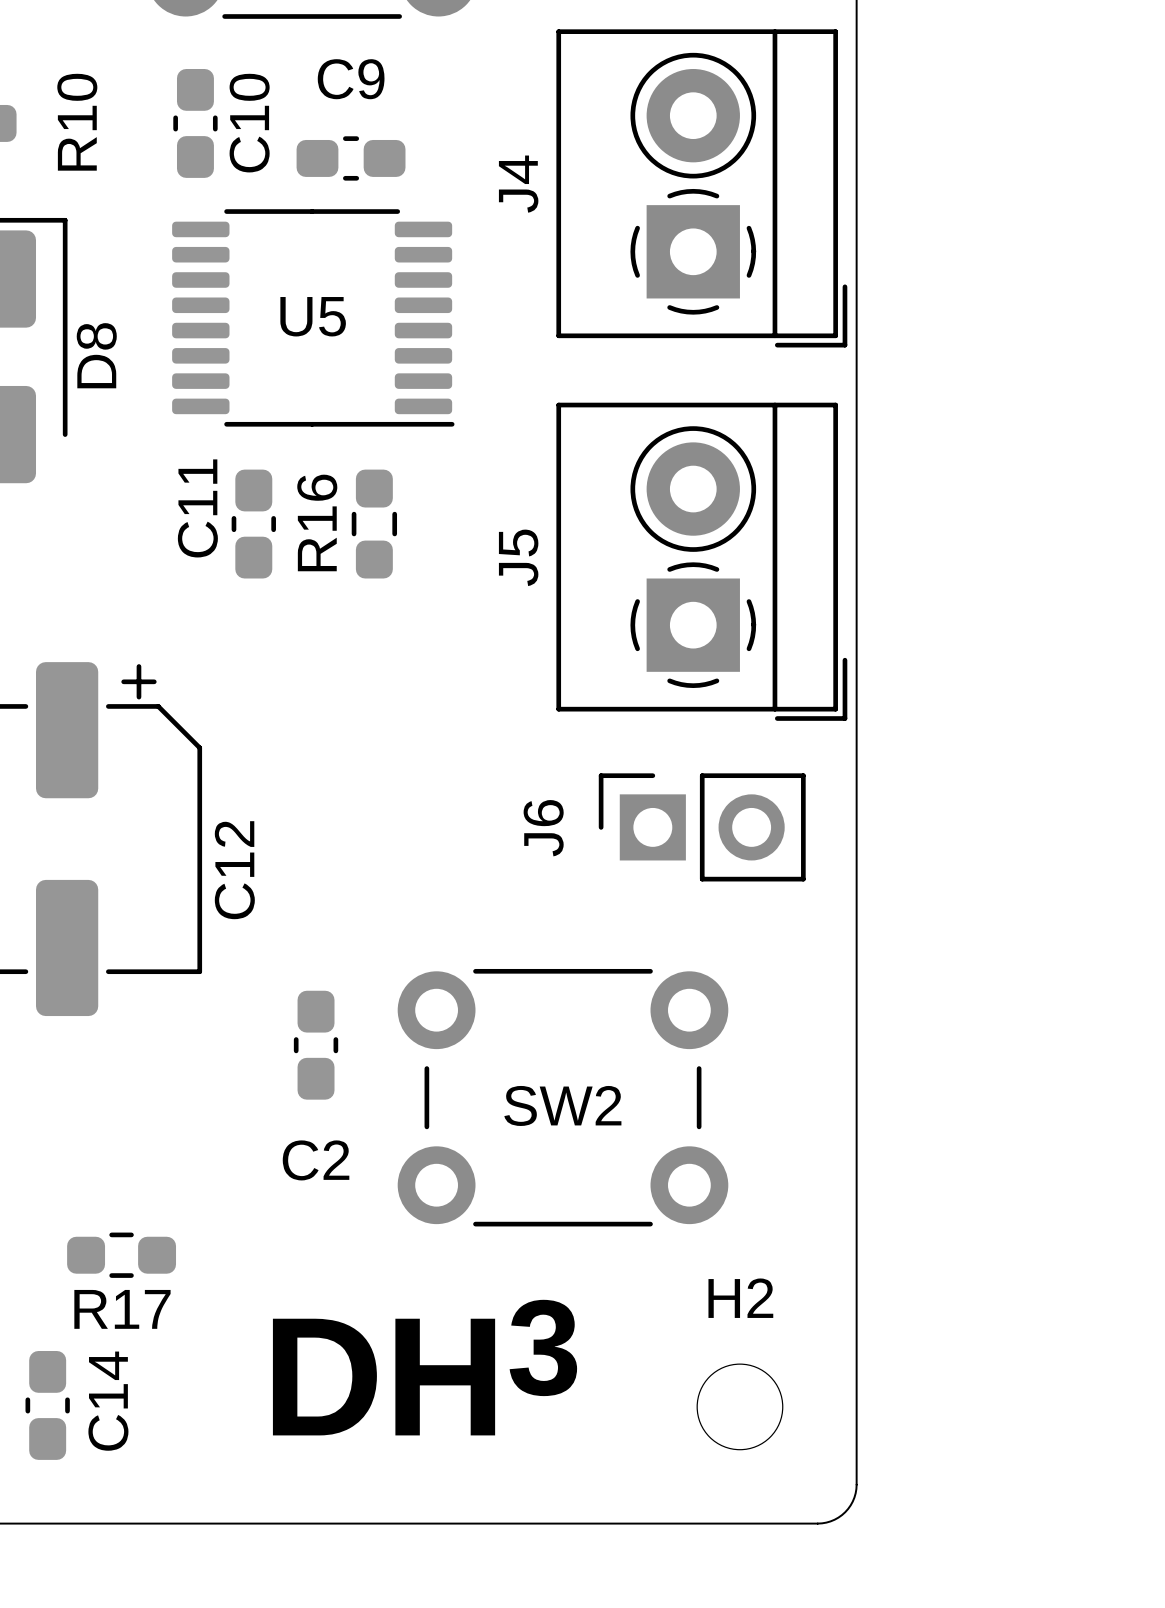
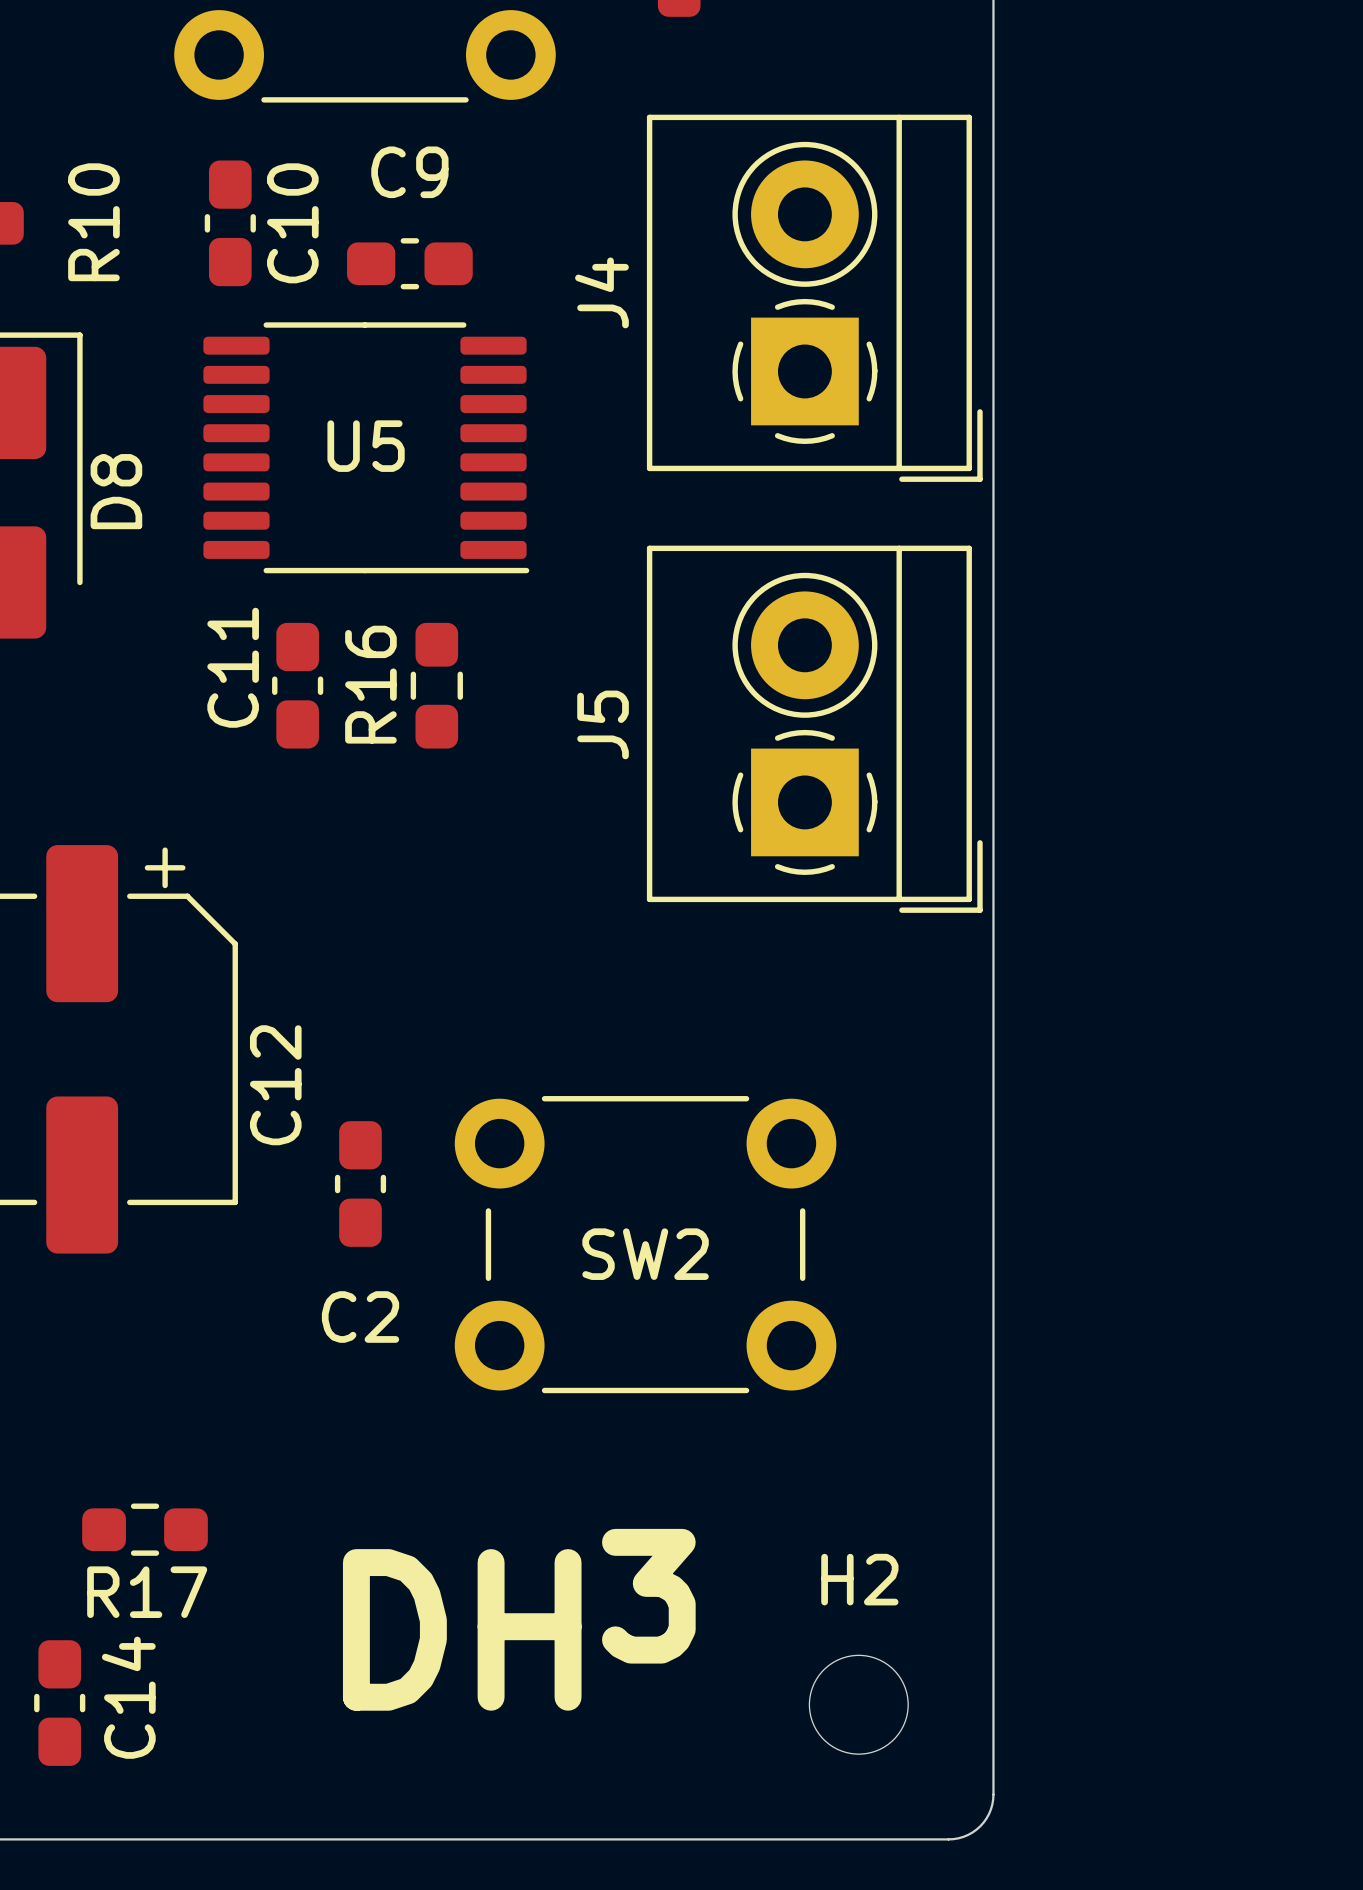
J6: (702, 827) -> none
C2 position: (316, 1045) -> (360, 1184)
SW2 position: (563, 1097) -> (645, 1244)
text position: DH3 (425, 1367) -> DH3 (519, 1619)

